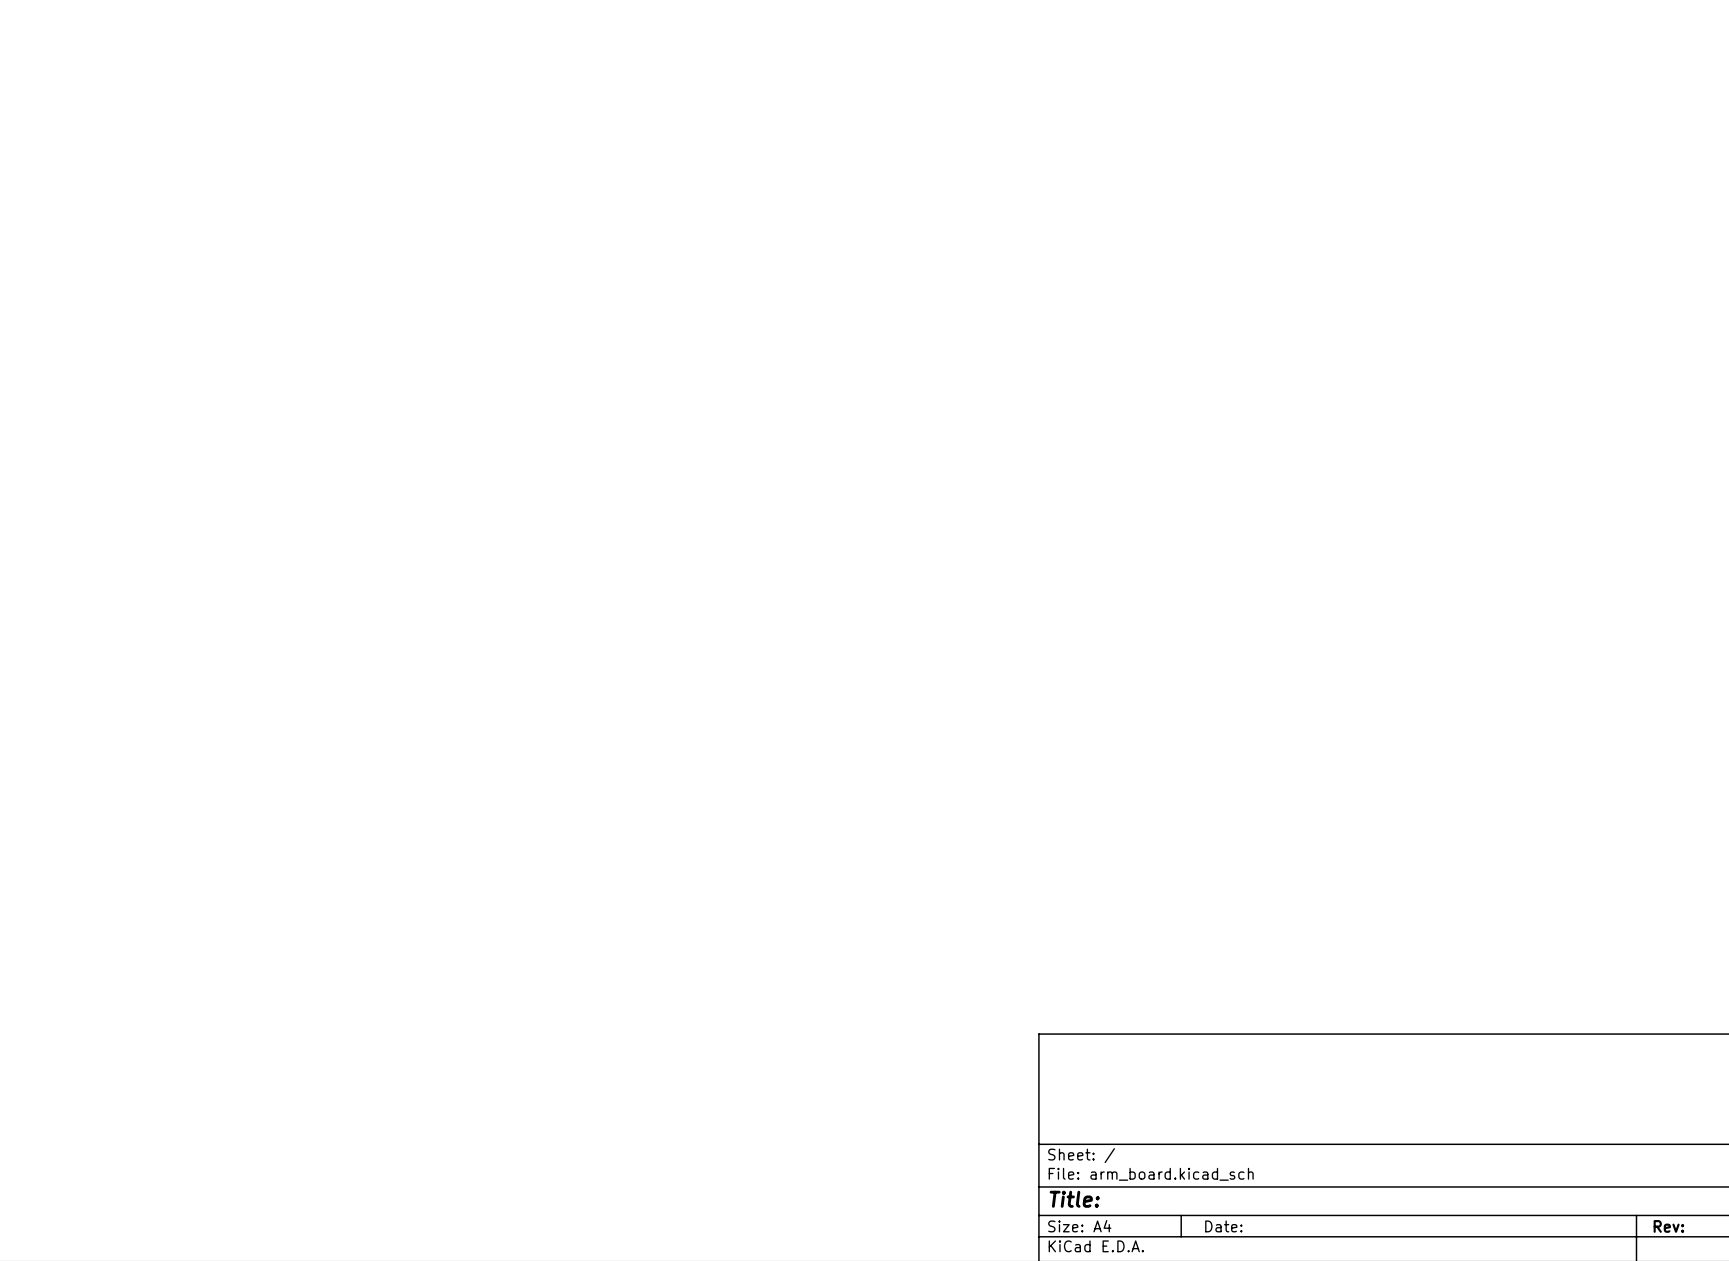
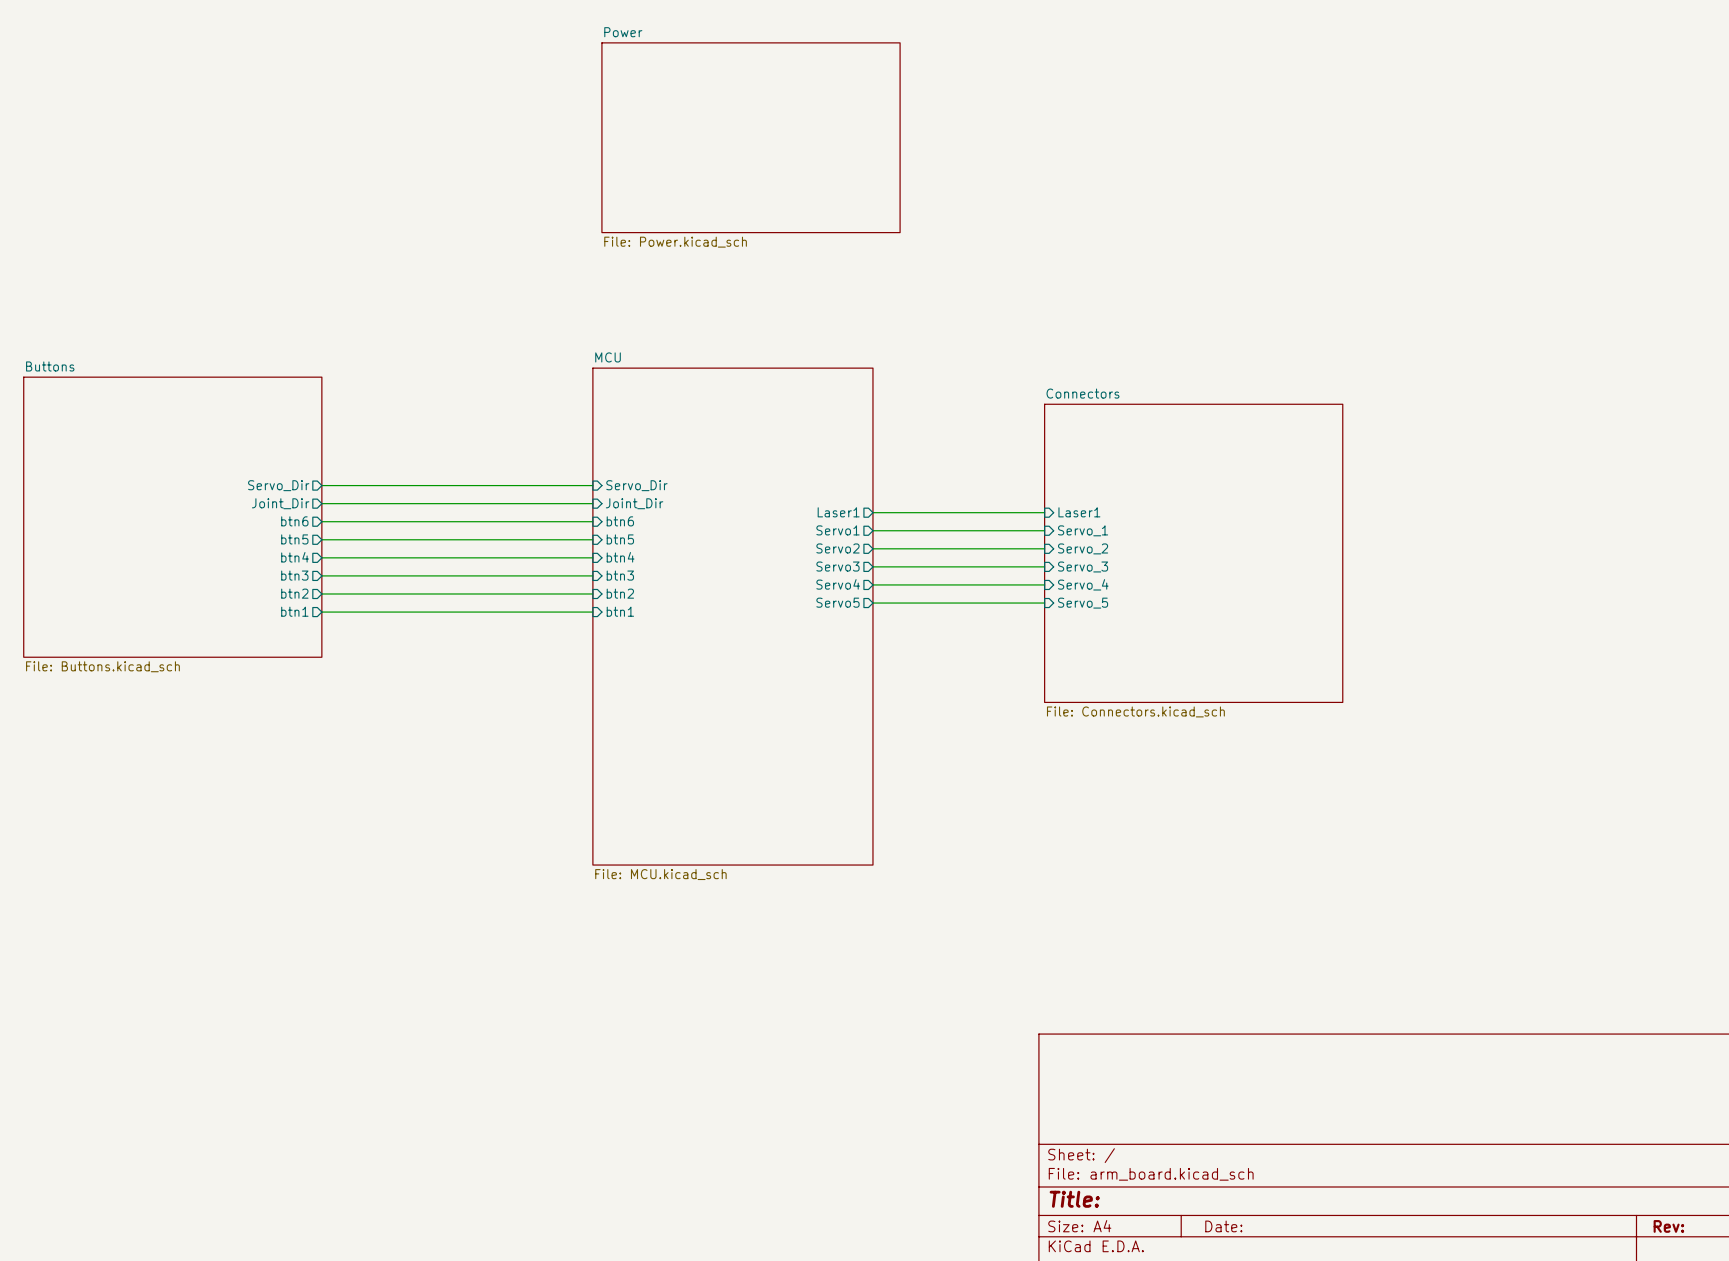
sheet Power: none -> File: Power.kicad_sch (751, 137)
sheet pin: none -> Servo_Dir (278, 485)
wire: none -> (321, 485) (592, 485)
sheet pin: none -> Servo_Dir (636, 485)
sheet pin: none -> Joint_Dir (280, 503)
wire: none -> (321, 503) (592, 503)
sheet pin: none -> Joint_Dir (634, 503)
sheet pin: none -> Laser1 (838, 512)
wire: none -> (872, 512) (1044, 512)
sheet pin: none -> Laser1 (1079, 512)
sheet Buttons: none -> File: Buttons.kicad_sch (172, 517)
sheet pin: none -> btn6 (294, 521)
wire: none -> (321, 521) (592, 521)
sheet pin: none -> btn6 (620, 521)
sheet pin: none -> Servo1 (837, 530)
wire: none -> (872, 530) (1044, 530)
sheet pin: none -> Servo_1 (1083, 530)
sheet pin: none -> btn5 (294, 539)
wire: none -> (321, 539) (592, 539)
sheet pin: none -> btn5 (620, 539)
sheet pin: none -> Servo2 (837, 548)
wire: none -> (872, 548) (1044, 548)
sheet pin: none -> Servo_2 (1083, 548)
sheet Connectors: none -> File: Connectors.kicad_sch (1193, 553)
sheet pin: none -> btn4 (295, 557)
wire: none -> (321, 557) (592, 557)
sheet pin: none -> btn4 (620, 557)
sheet pin: none -> Servo3 (837, 566)
wire: none -> (872, 566) (1044, 566)
sheet pin: none -> Servo_3 (1083, 566)
sheet pin: none -> btn3 (294, 575)
wire: none -> (321, 575) (592, 575)
sheet pin: none -> btn3 (620, 575)
sheet pin: none -> Servo4 (838, 584)
wire: none -> (872, 584) (1044, 584)
sheet pin: none -> Servo_4 (1083, 584)
sheet pin: none -> btn2 (294, 593)
wire: none -> (321, 593) (592, 593)
sheet pin: none -> btn2 (620, 593)
sheet pin: none -> Servo5 (837, 602)
wire: none -> (872, 603) (1044, 603)
sheet pin: none -> Servo_5 (1083, 603)
sheet pin: none -> btn1 (294, 611)
sheet pin: none -> btn1 (620, 611)
wire: none -> (321, 612) (592, 612)
sheet MCU: none -> File: MCU.kicad_sch (732, 616)

